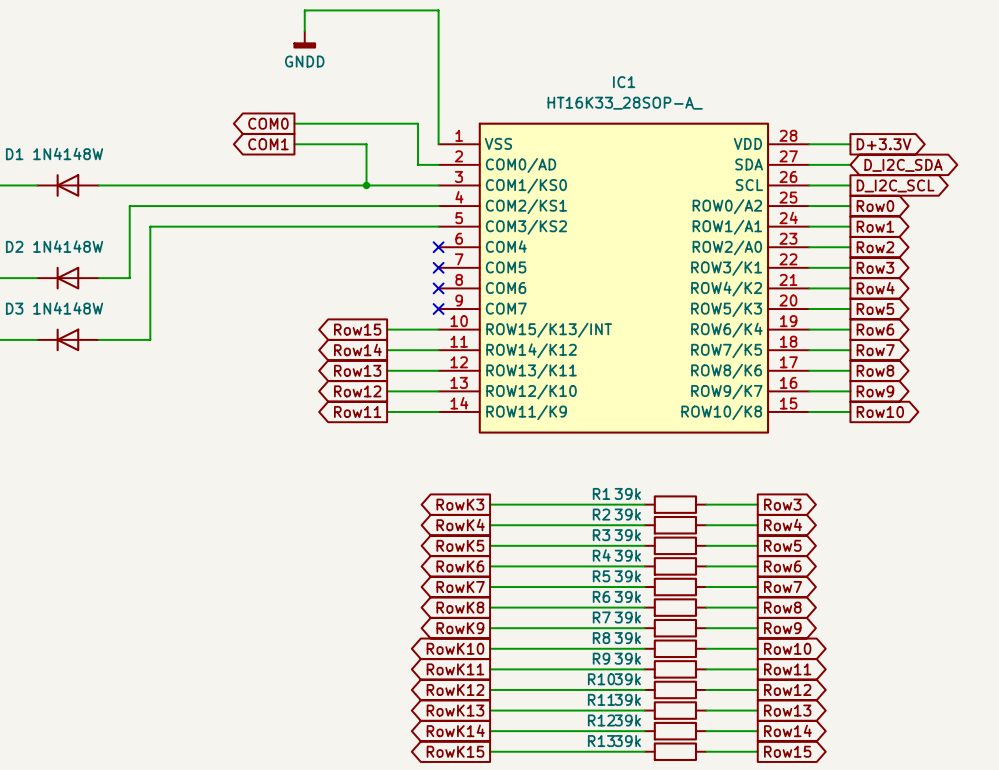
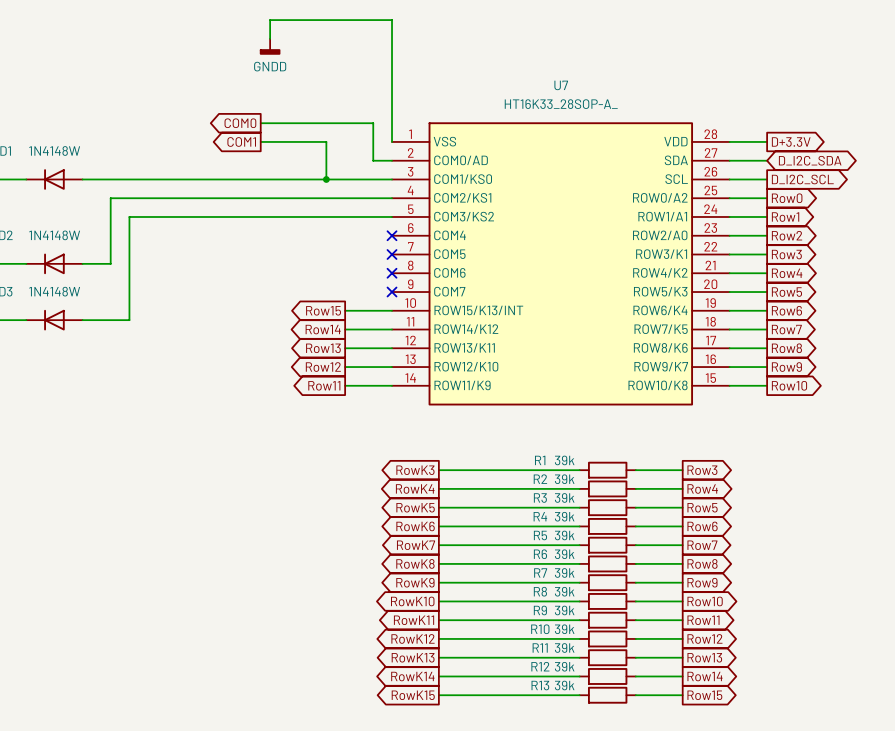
IC1 name: IC1 (624, 82) -> U7 (561, 85)

